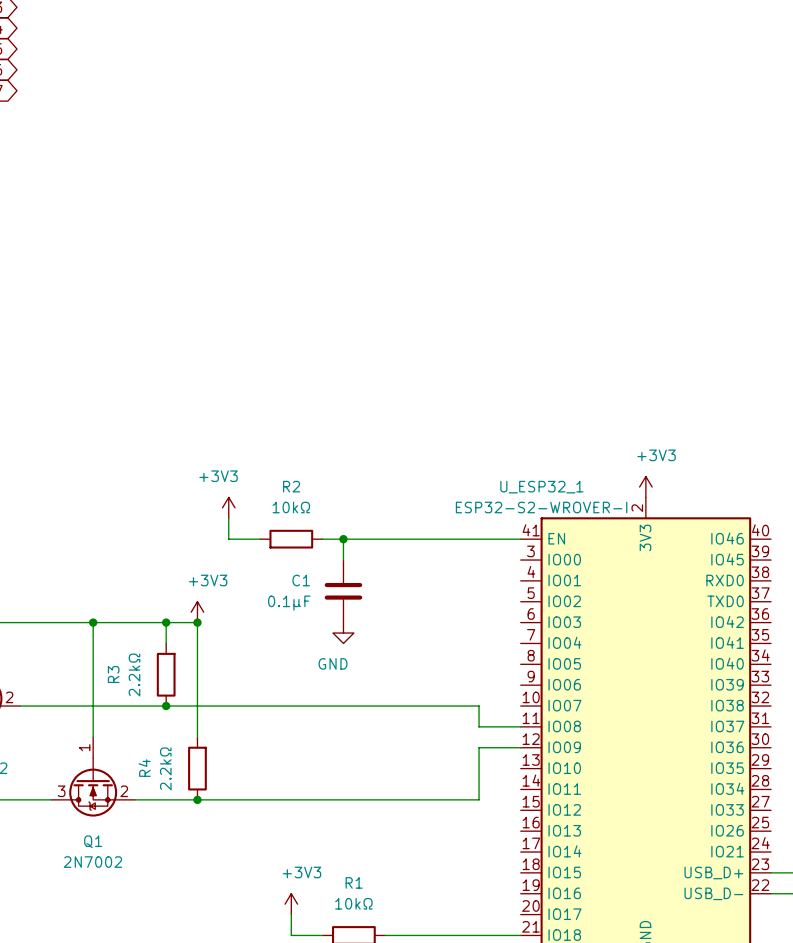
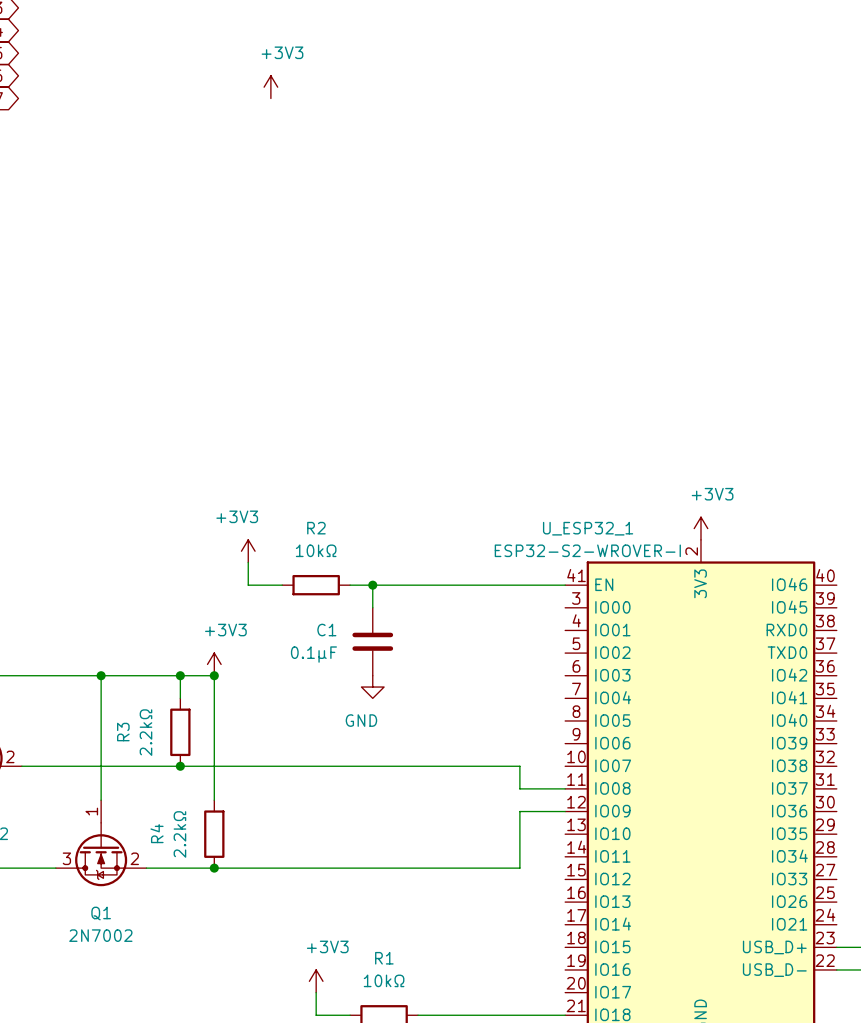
power symbol: none -> +3V3 (270, 87)

